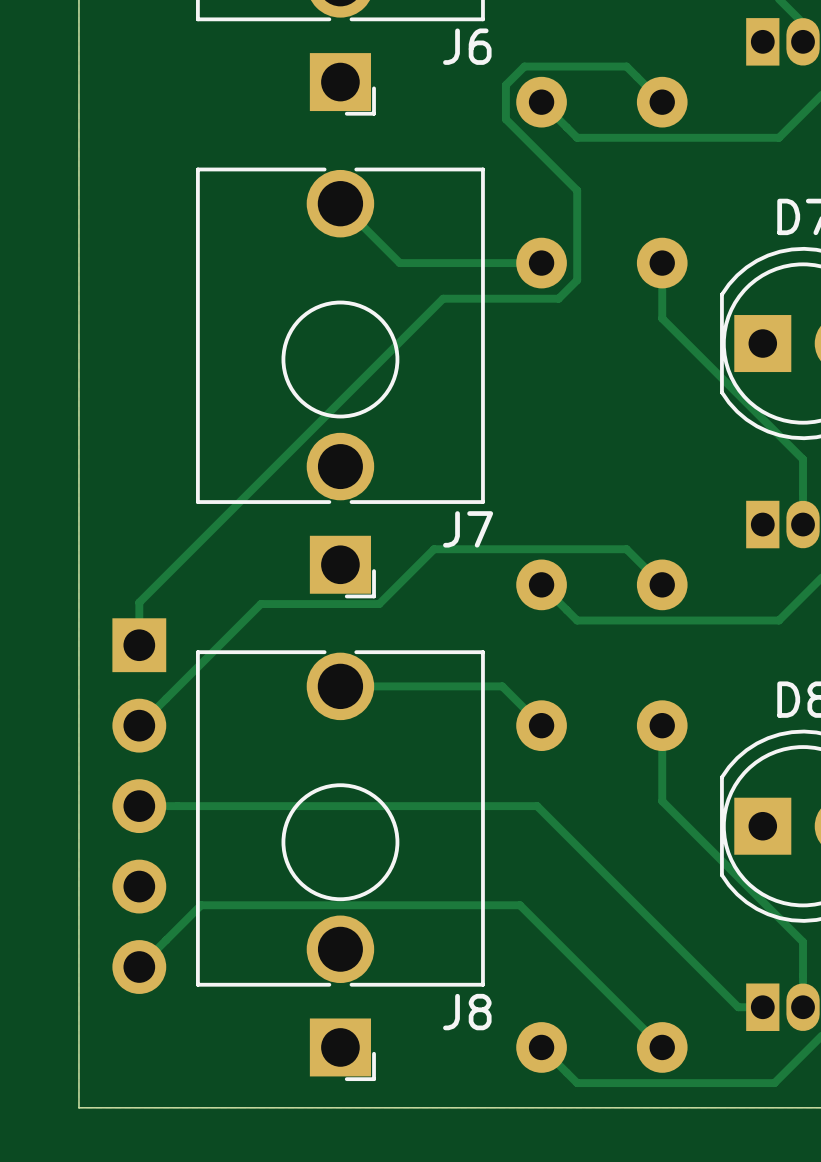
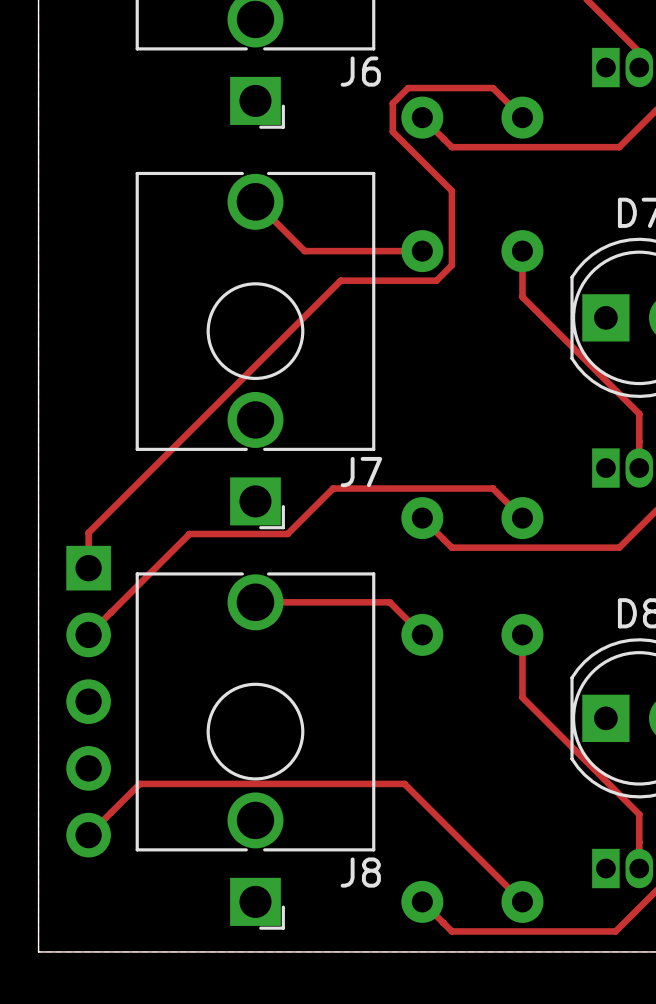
track: (139, 806) (537, 806) (738, 1007) (762, 1007) -> none

